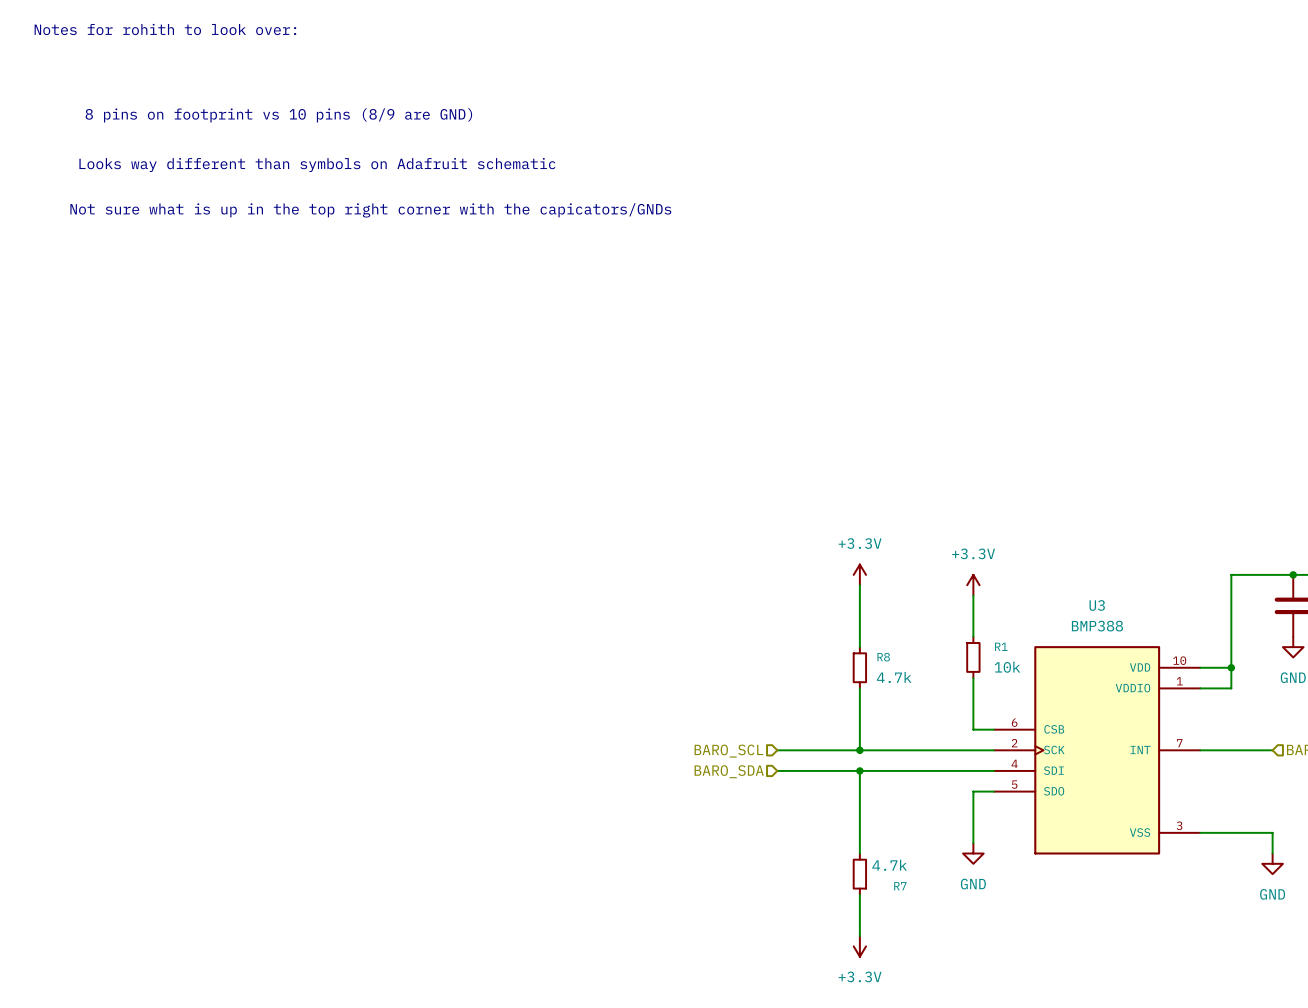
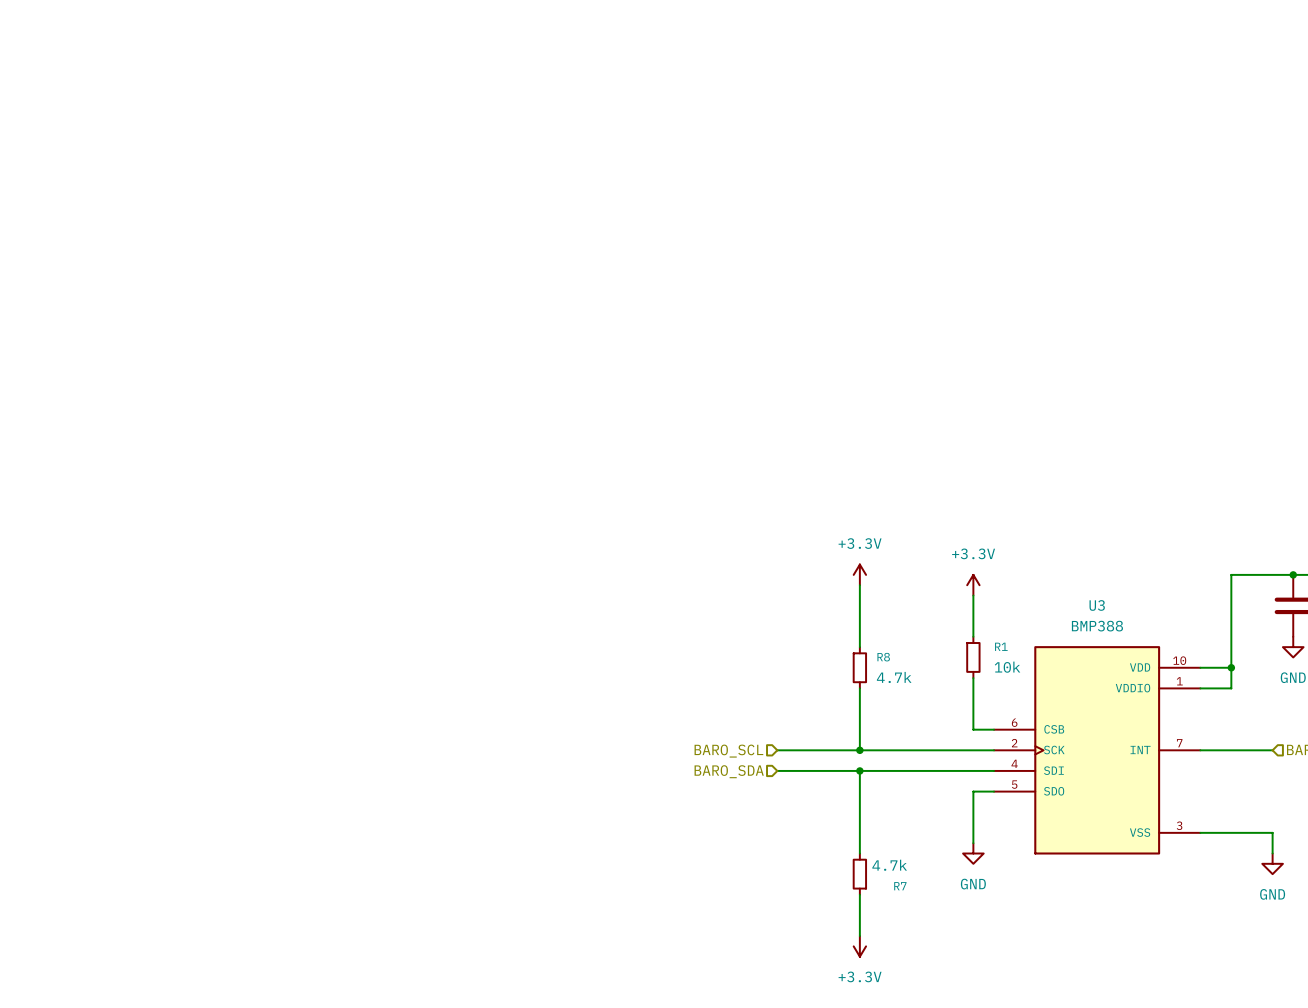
text: Notes for rohith to look over: (165, 29) -> none
text: 8 pins on footprint vs 10 pins (8/9 are GND) (278, 115) -> none
text: Looks way different than symbols on Adafruit schematic (317, 164) -> none
text: Not sure what is up in the top right corner with the capicators/GNDs (370, 210) -> none

